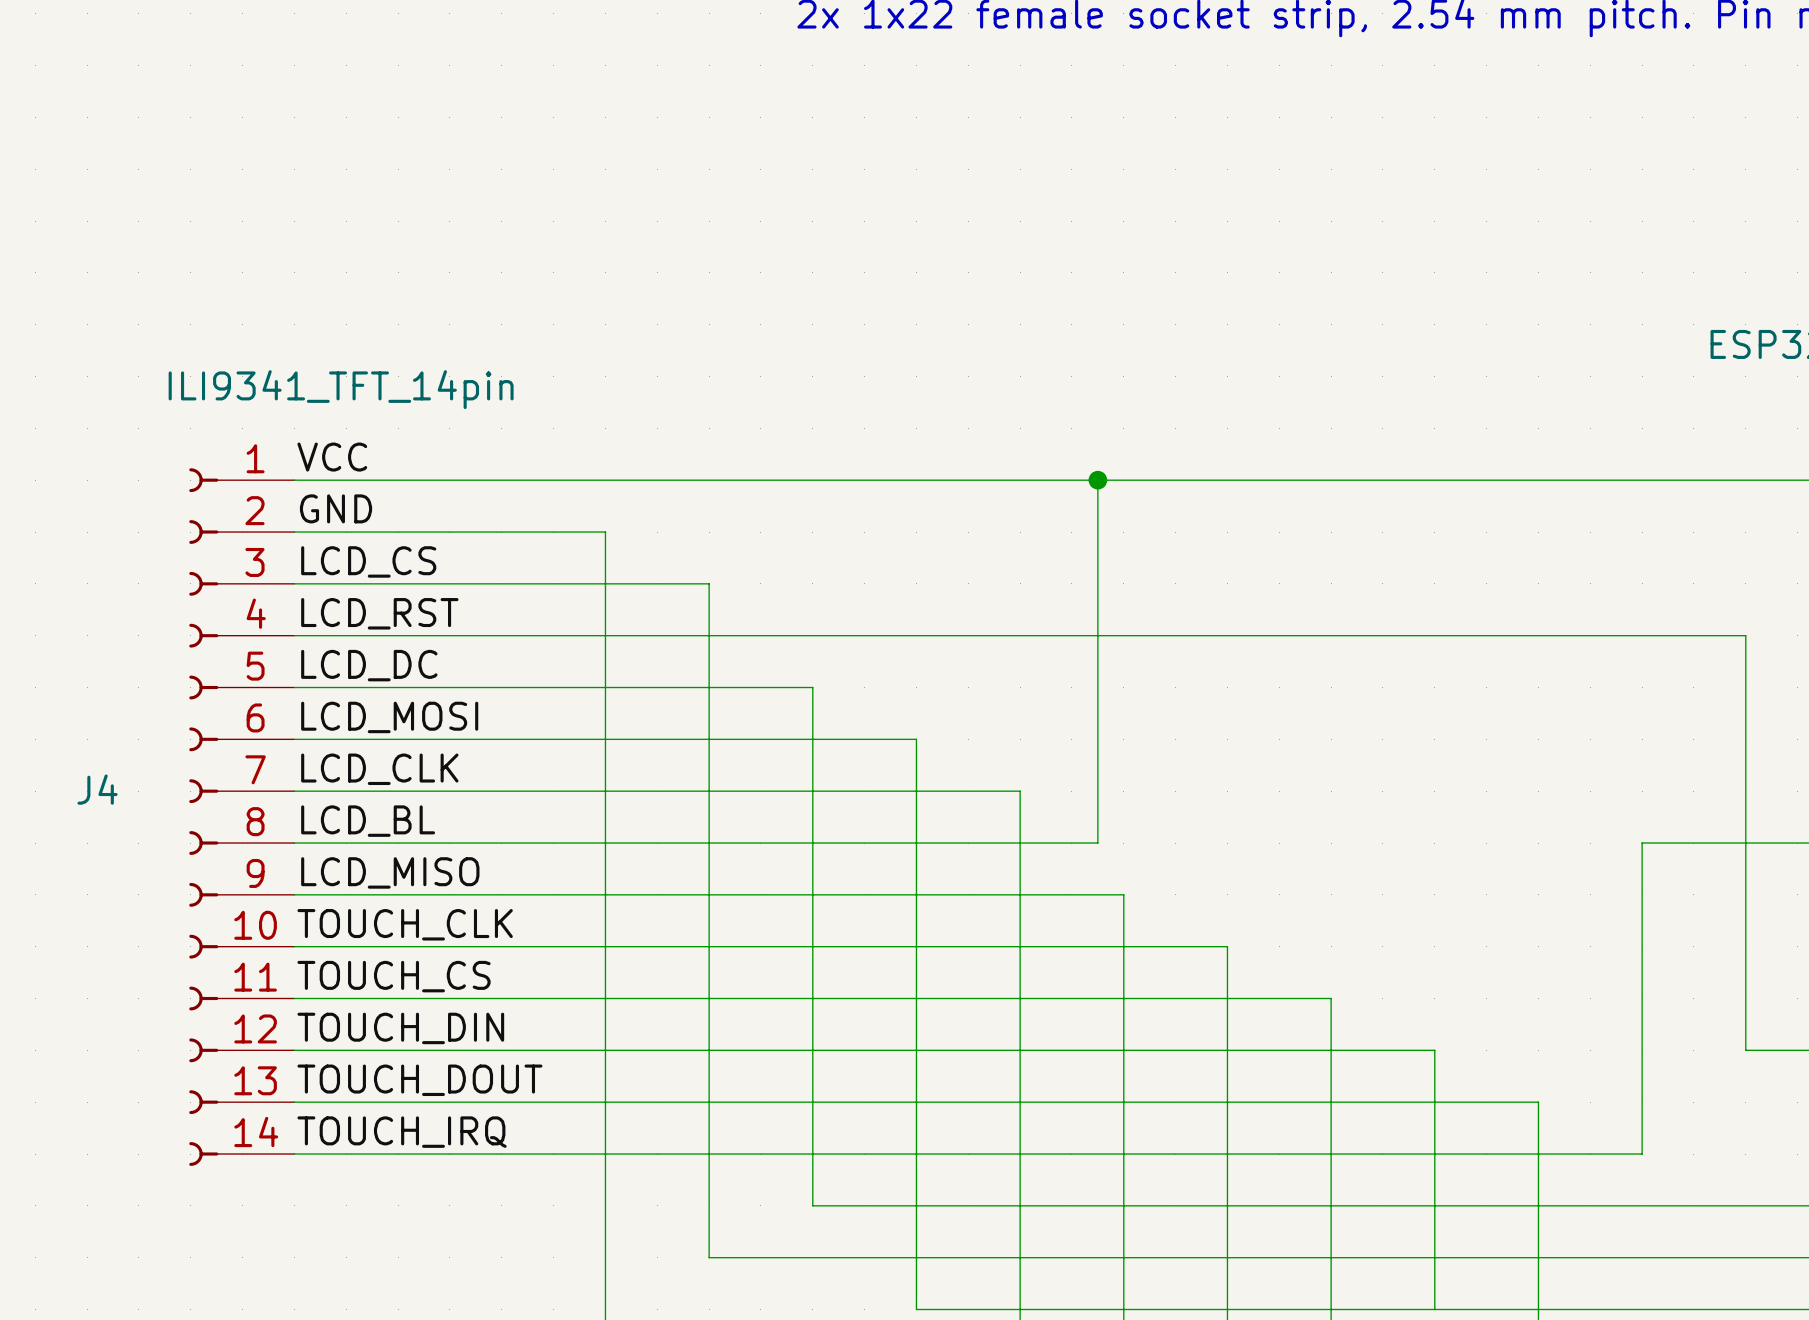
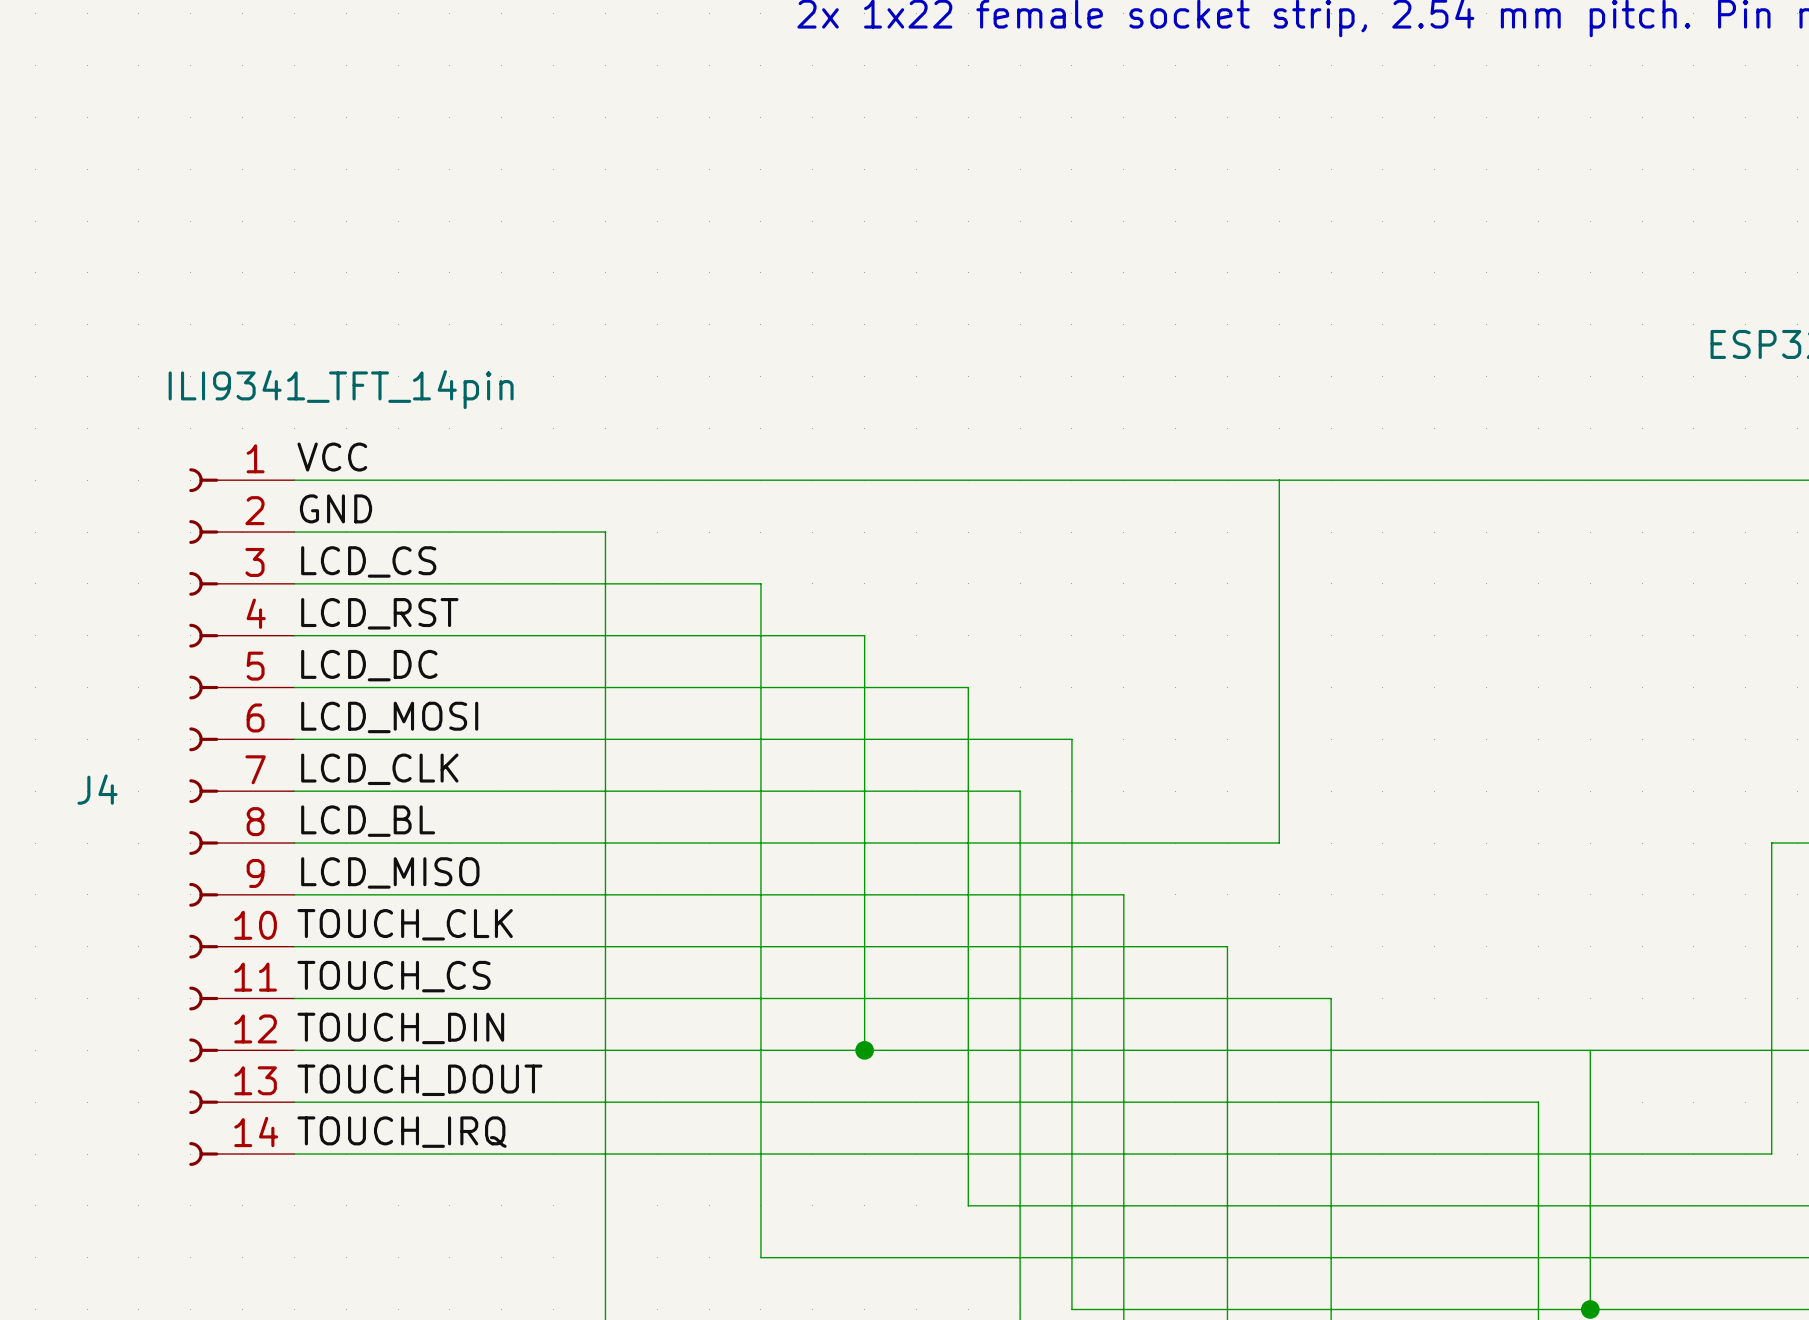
wire: (1097, 480) (1097, 843) -> (1279, 480) (1279, 843) (1097, 843)
junction: (1097, 480) -> none
wire: (709, 583) (709, 1257) (760, 1257) -> (709, 583) (760, 583) (760, 1257)
wire: (864, 635) (1745, 635) (1745, 1050) -> (864, 635) (864, 1050)
wire: (812, 687) (812, 1205) (968, 1205) -> (812, 687) (968, 687) (968, 1205)
wire: (916, 739) (916, 1309) (1071, 1309) -> (916, 739) (1071, 739) (1071, 1309)
wire: (1771, 843) (1642, 843) (1642, 1154) -> (1771, 843) (1771, 1154) (1642, 1154)
junction: none -> (864, 1050)
wire: (1434, 1050) (1434, 1309) -> (1434, 1050) (1745, 1050)
wire: none -> (1590, 1050) (1590, 1309)
junction: none -> (1590, 1309)

